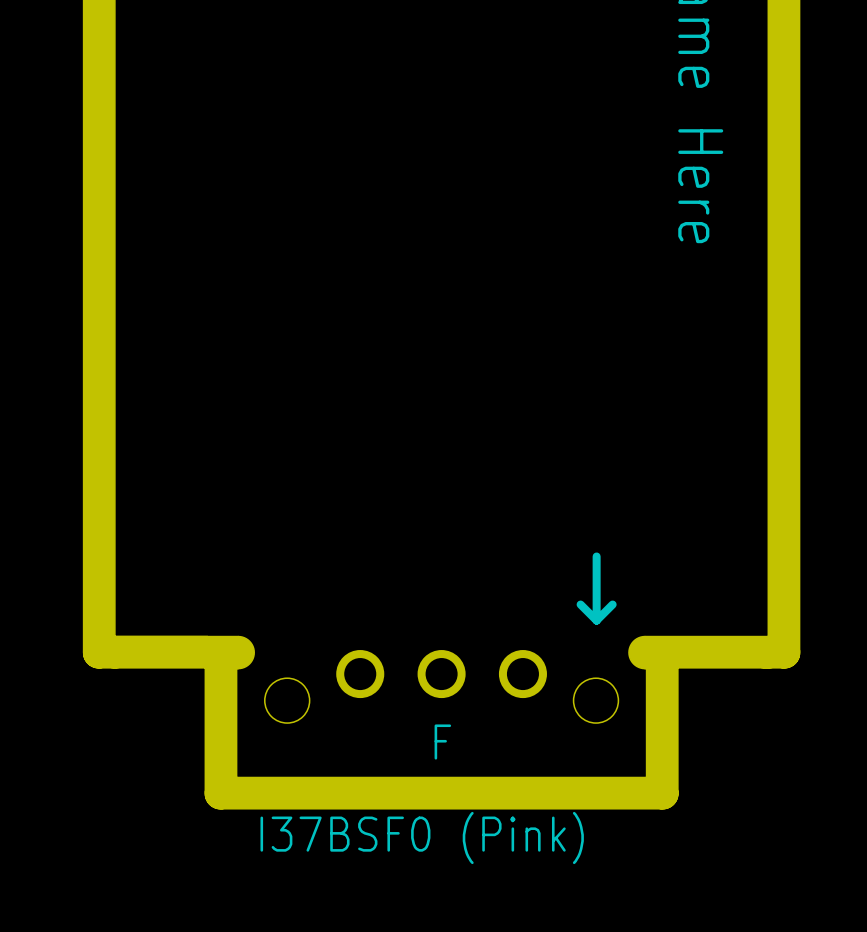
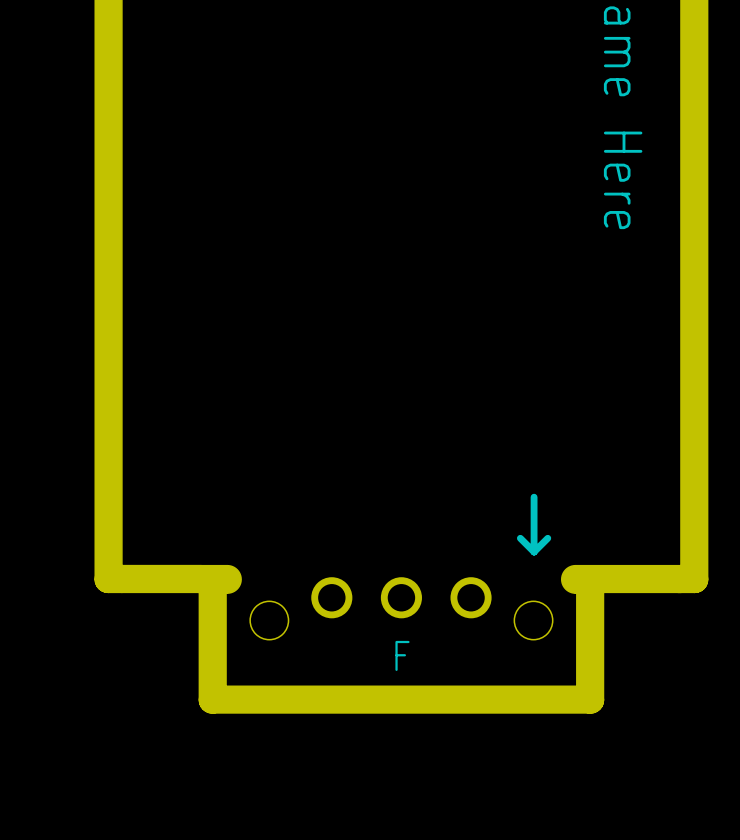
text: I37BSF0 (Pink) (422, 837) -> none

